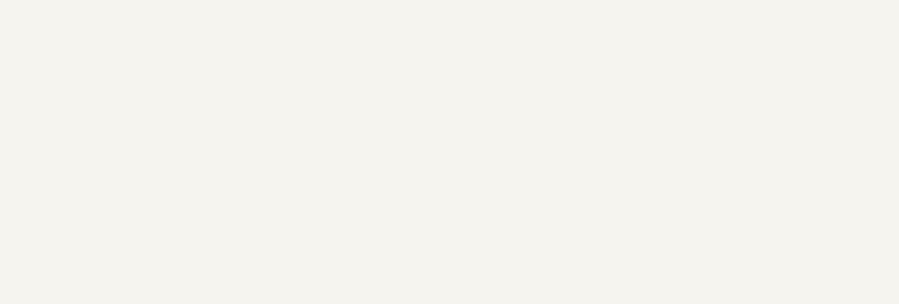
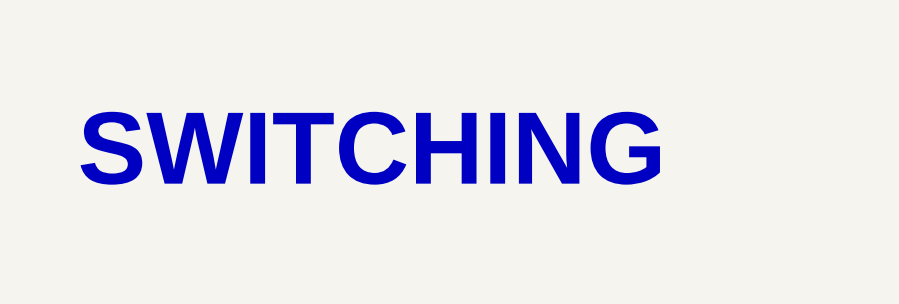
text: none -> SWITCHING (370, 148)

